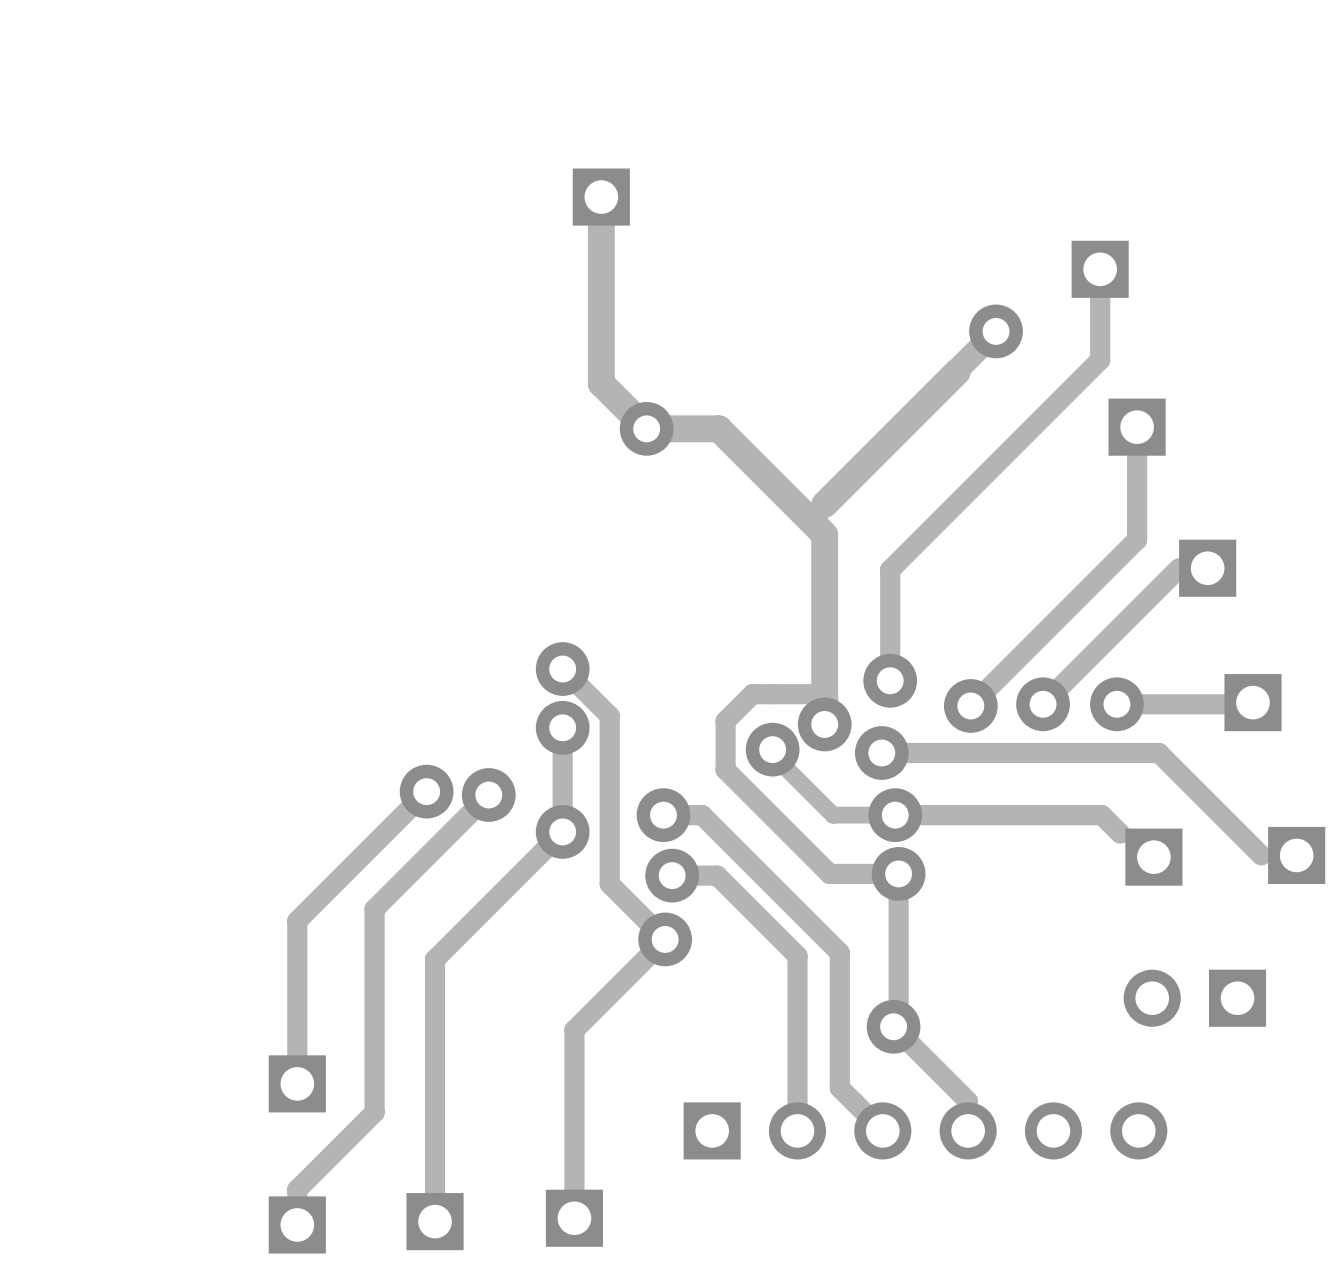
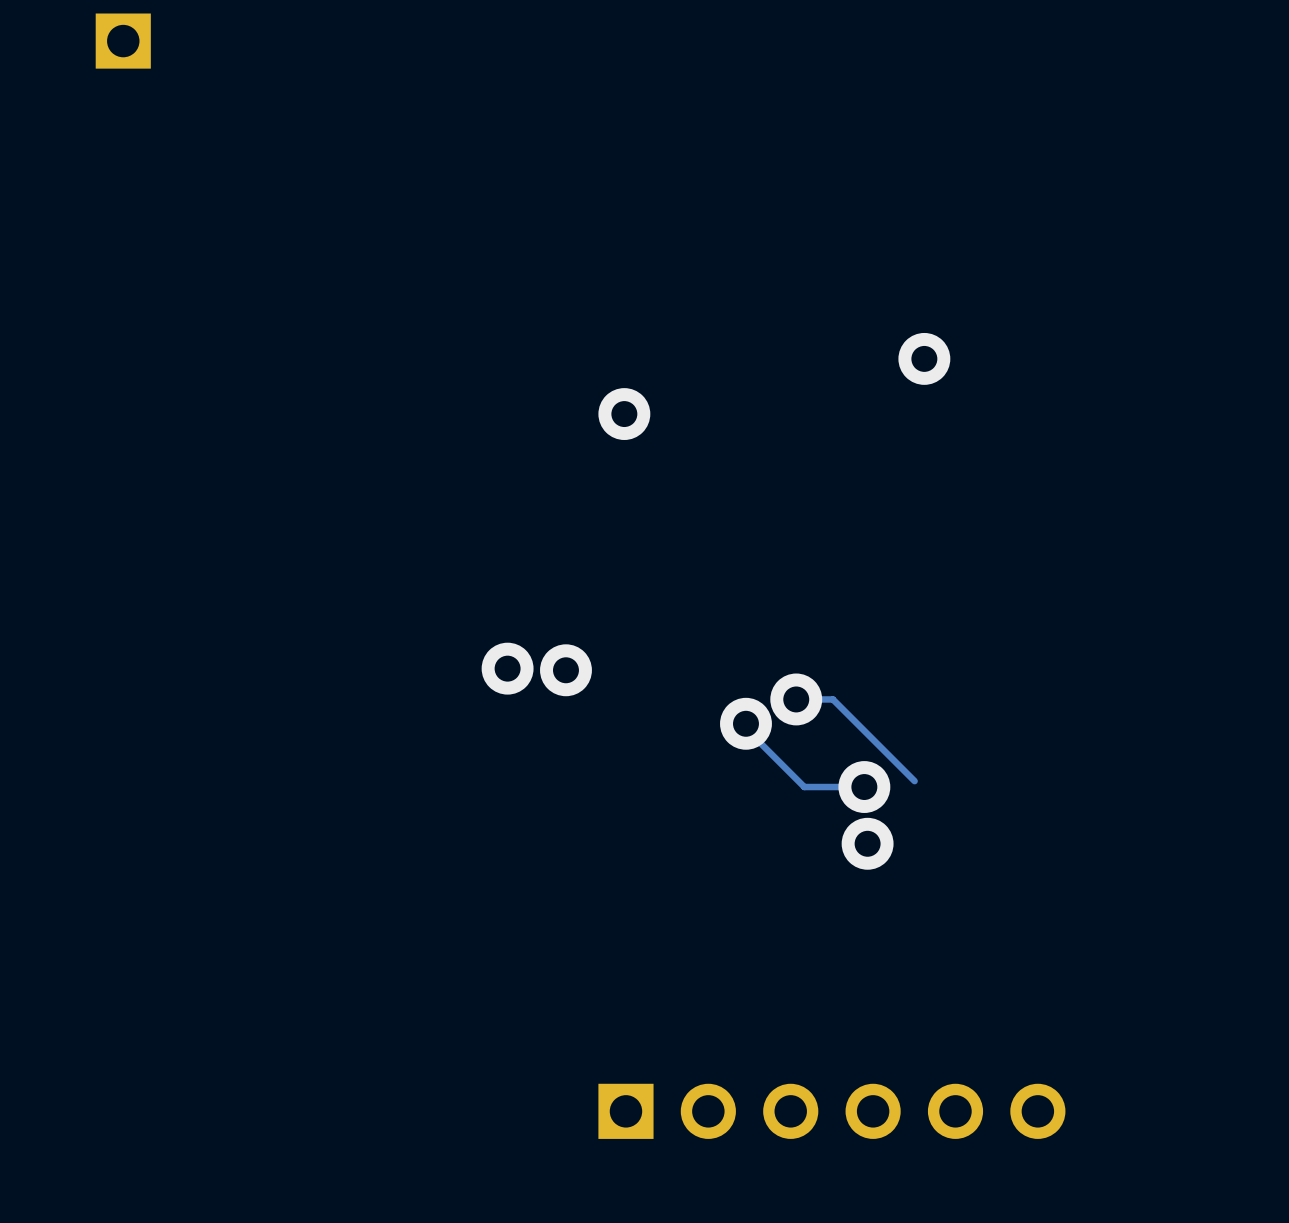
track: (601, 197) (601, 383) (646, 428) (718, 428) (824, 534) -> none
part position: (601, 197) -> (123, 41)
track: (1100, 269) (1100, 359) (890, 569) (890, 680) -> none
part: (1100, 269) -> none
track: (996, 331) (824, 504) (824, 724) -> (914, 781) (832, 699) (796, 699)
via position: (996, 331) -> (924, 358)
track: (1137, 427) (1137, 539) (970, 705) -> none
part: (1137, 427) -> none
track: (1207, 568) (1179, 568) (1043, 704) -> none
part: (1207, 568) -> none
track: (562, 669) (609, 716) (609, 884) (665, 939) (574, 1030) (574, 1218) -> none
via: (562, 669) -> none
via: (890, 680) -> none
via: none -> (507, 668)
via: none -> (565, 670)
track: (824, 694) (752, 694) (725, 721) (725, 769) (829, 873) (898, 873) (898, 1021) (893, 1026) (968, 1101) (968, 1130) -> none
track: (1252, 702) (1251, 704) (1116, 704) -> none
part: (1252, 702) -> none
via: (1043, 704) -> none
via: (1116, 704) -> none
via: (970, 705) -> none
track: (562, 727) (562, 831) (435, 959) (435, 1221) -> none
via: (562, 727) -> none
track width: thick (767, 749) (833, 815) (895, 815) -> thin (741, 723) (804, 787) (864, 787)
track: (881, 753) (1158, 753) (1261, 855) (1296, 855) -> none
via: (881, 753) -> none
track: (426, 791) (297, 920) (297, 1083) -> none
via: (426, 791) -> none
track: (488, 794) (374, 909) (374, 1112) (297, 1189) (297, 1224) -> none
via: (488, 794) -> none
track: (663, 815) (702, 815) (839, 952) (839, 1087) (882, 1130) -> none
via: (663, 815) -> none
track: (895, 815) (1101, 815) (1120, 833) (1130, 833) (1153, 857) -> none
via: (562, 831) -> none
part: (1296, 855) -> none
part: (1153, 857) -> none
track: (672, 875) (717, 875) (797, 955) (797, 1130) -> none
via: (672, 875) -> none
via: (665, 939) -> none
part: (1194, 998) -> none
via: (893, 1026) -> none
part: (297, 1083) -> none
part position: (925, 1130) -> (831, 1111)
part: (574, 1218) -> none
part: (435, 1221) -> none
part: (297, 1224) -> none

